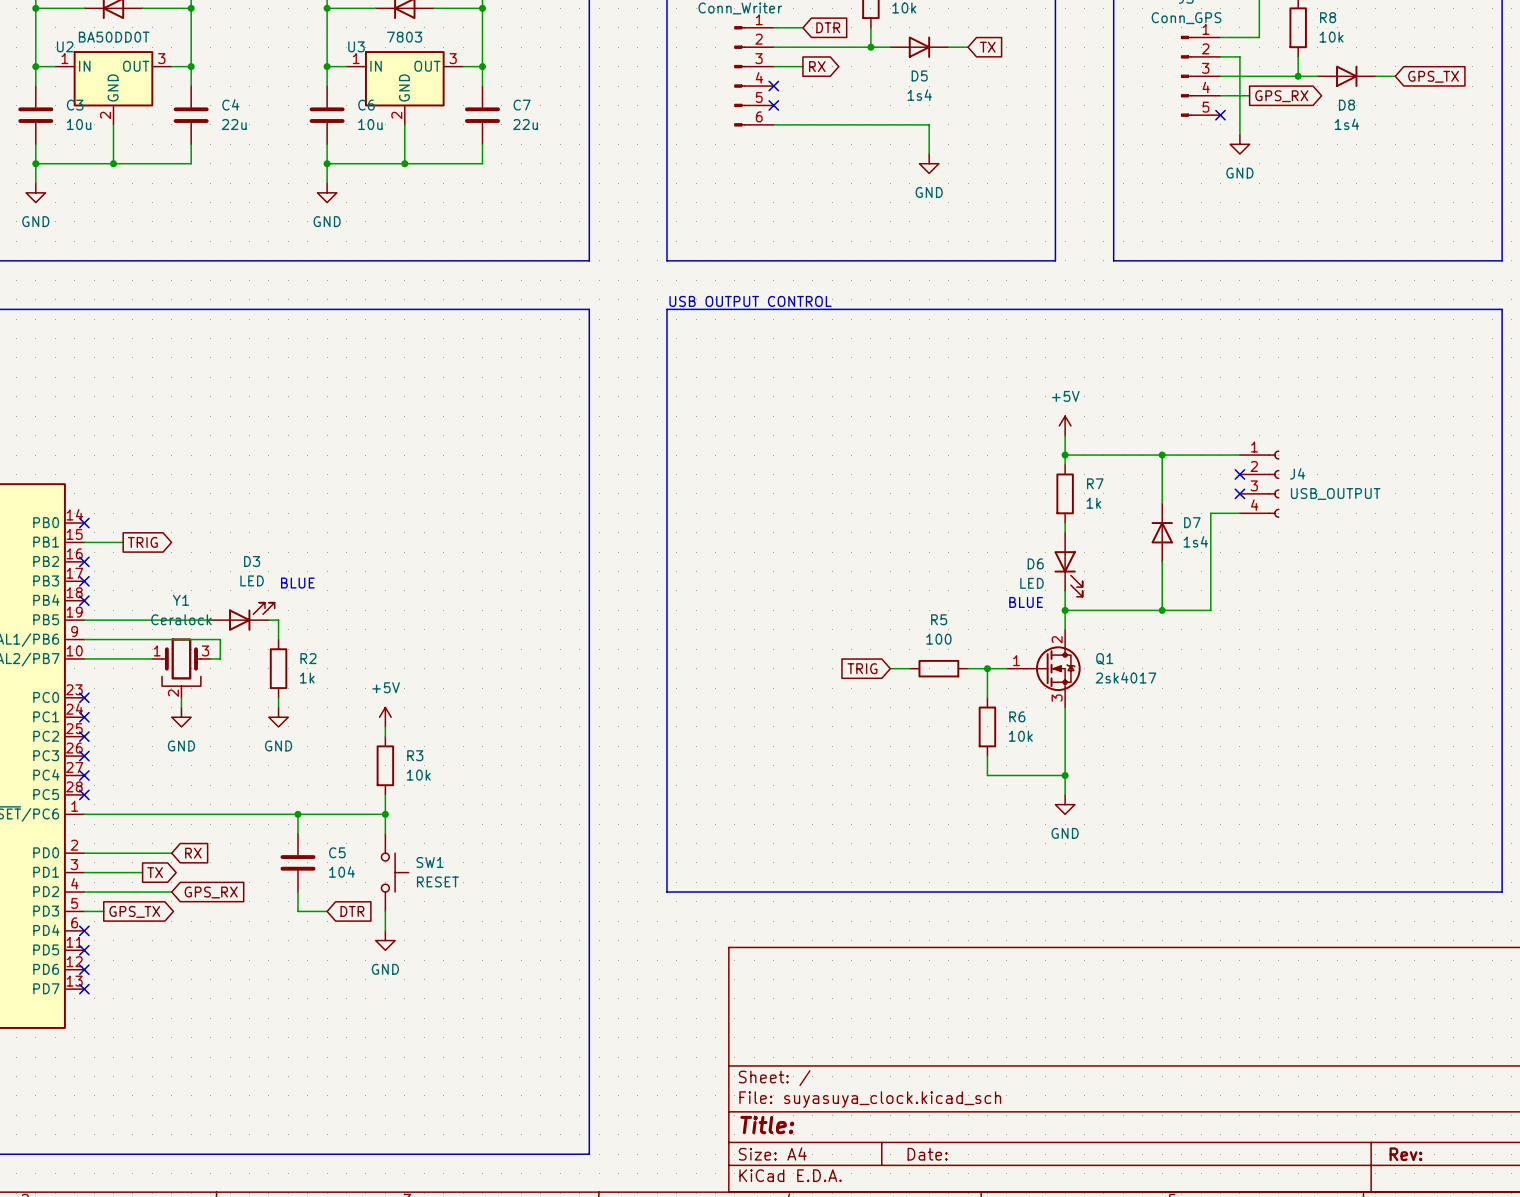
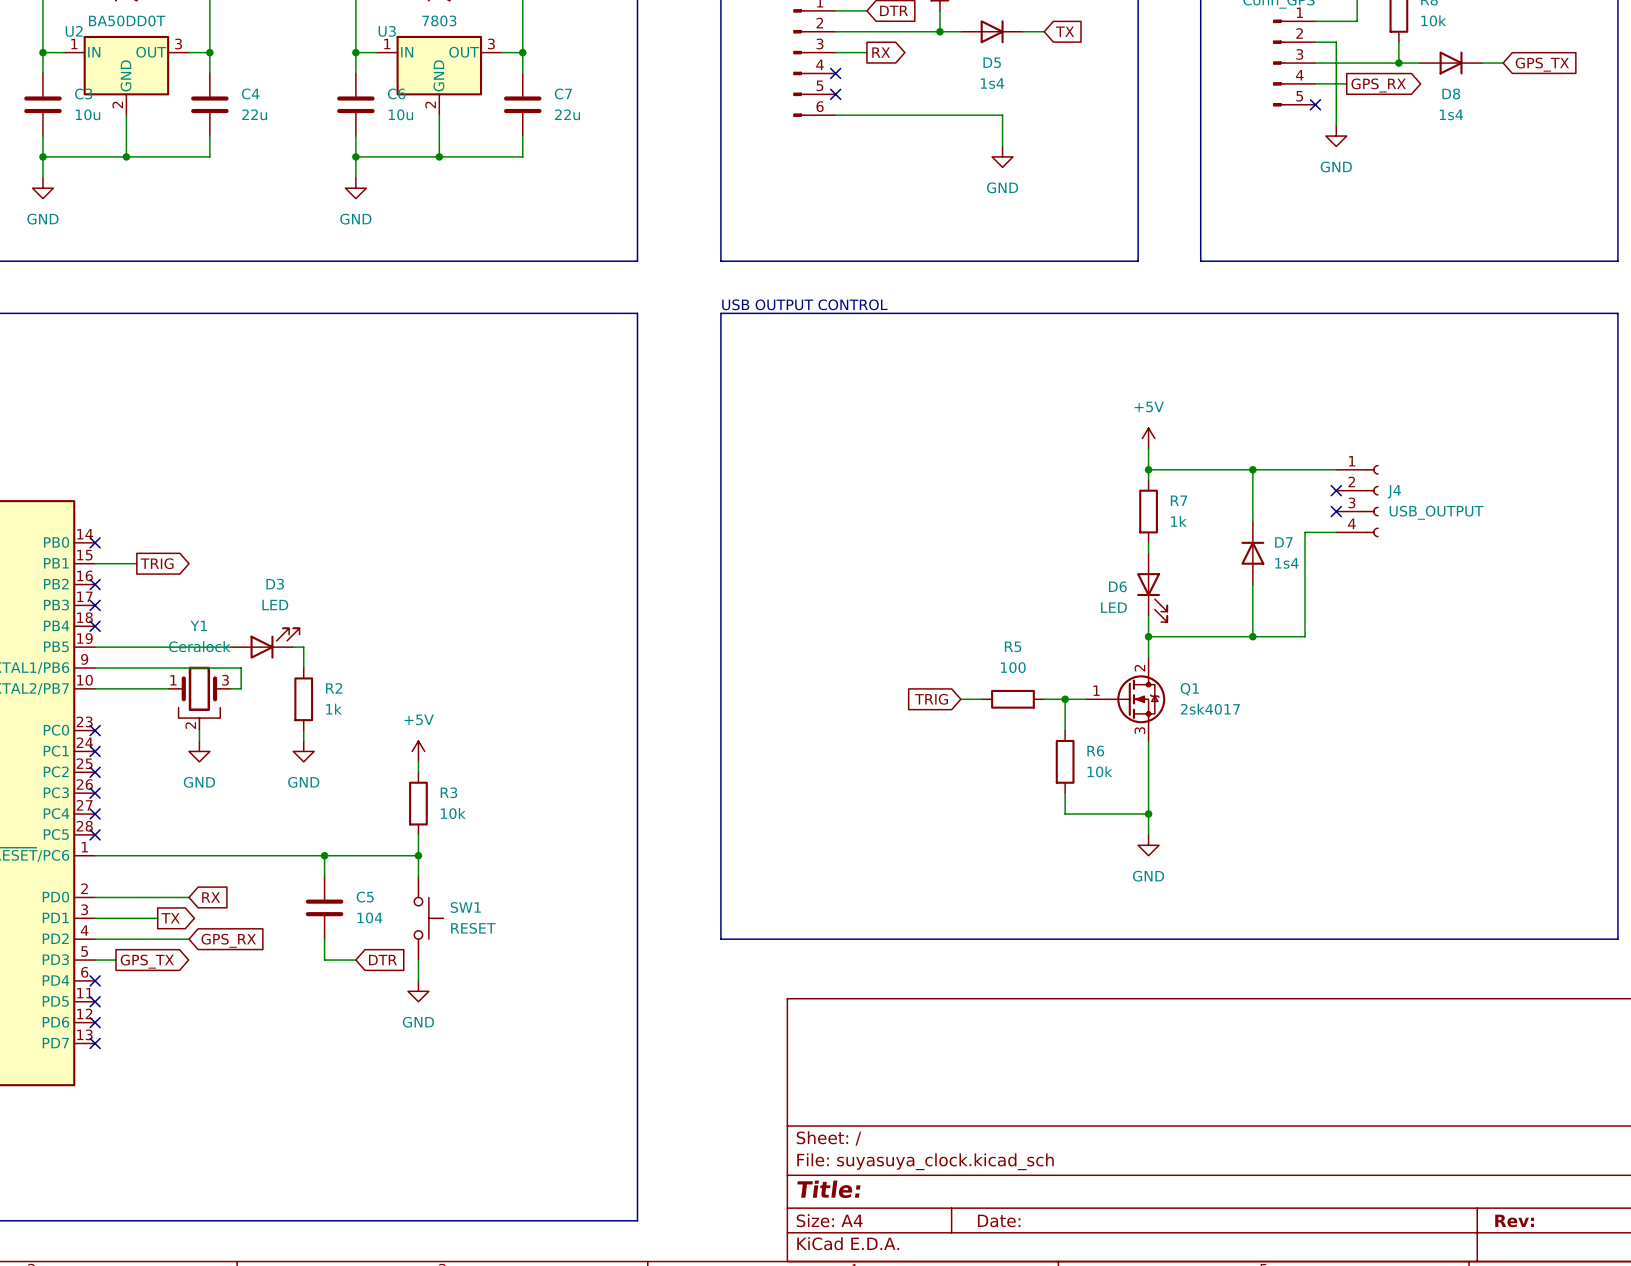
text: BLUE (297, 583) -> none
text: BLUE (1026, 602) -> none

